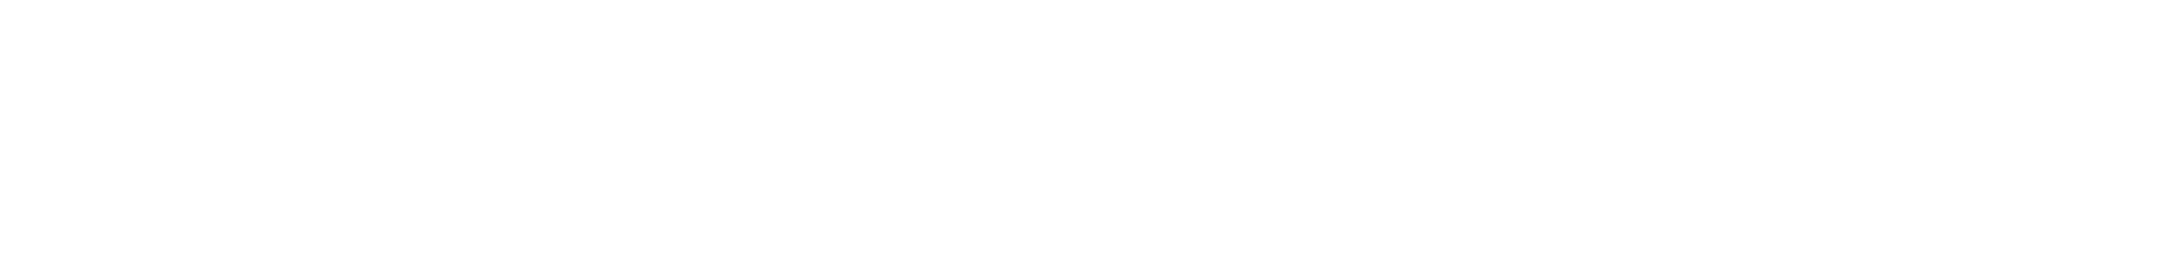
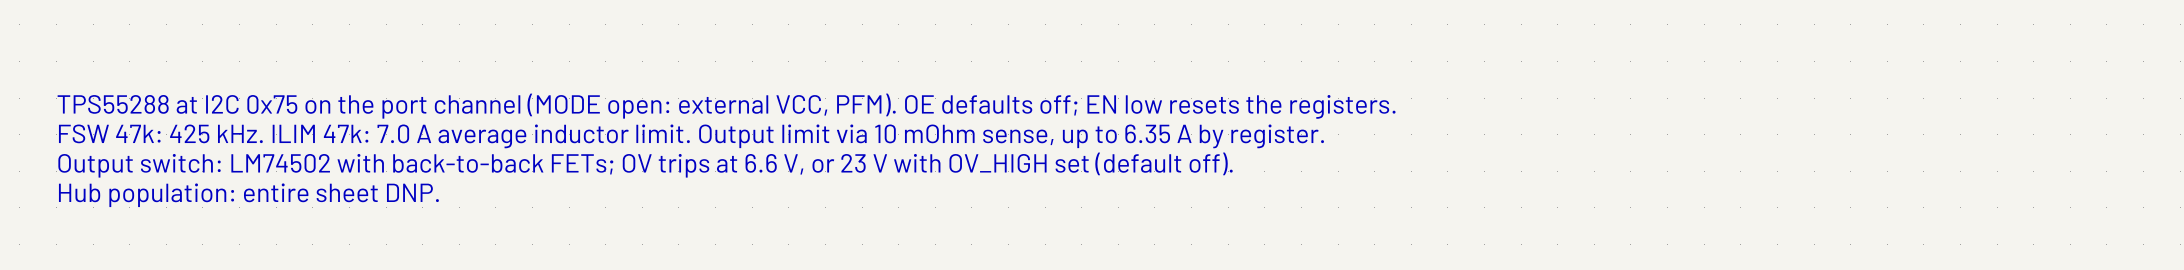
text: none -> TPS55288 at I2C 0x75 on the port channel (MODE open: external VCC, PFM). OE defaults off; EN low resets the registers. (726, 106)
text: none -> FSW 47k: 425 kHz. ILIM 47k: 7.0 A average inductor limit. Output limit via 10 mOhm sense, up to 6.35 A by register. (691, 136)
text: none -> Output switch: LM74502 with back-to-back FETs; OV trips at 6.6 V, or 23 V with OV_HIGH set (default off). (645, 165)
text: none -> Hub population: entire sheet DNP. (248, 195)

